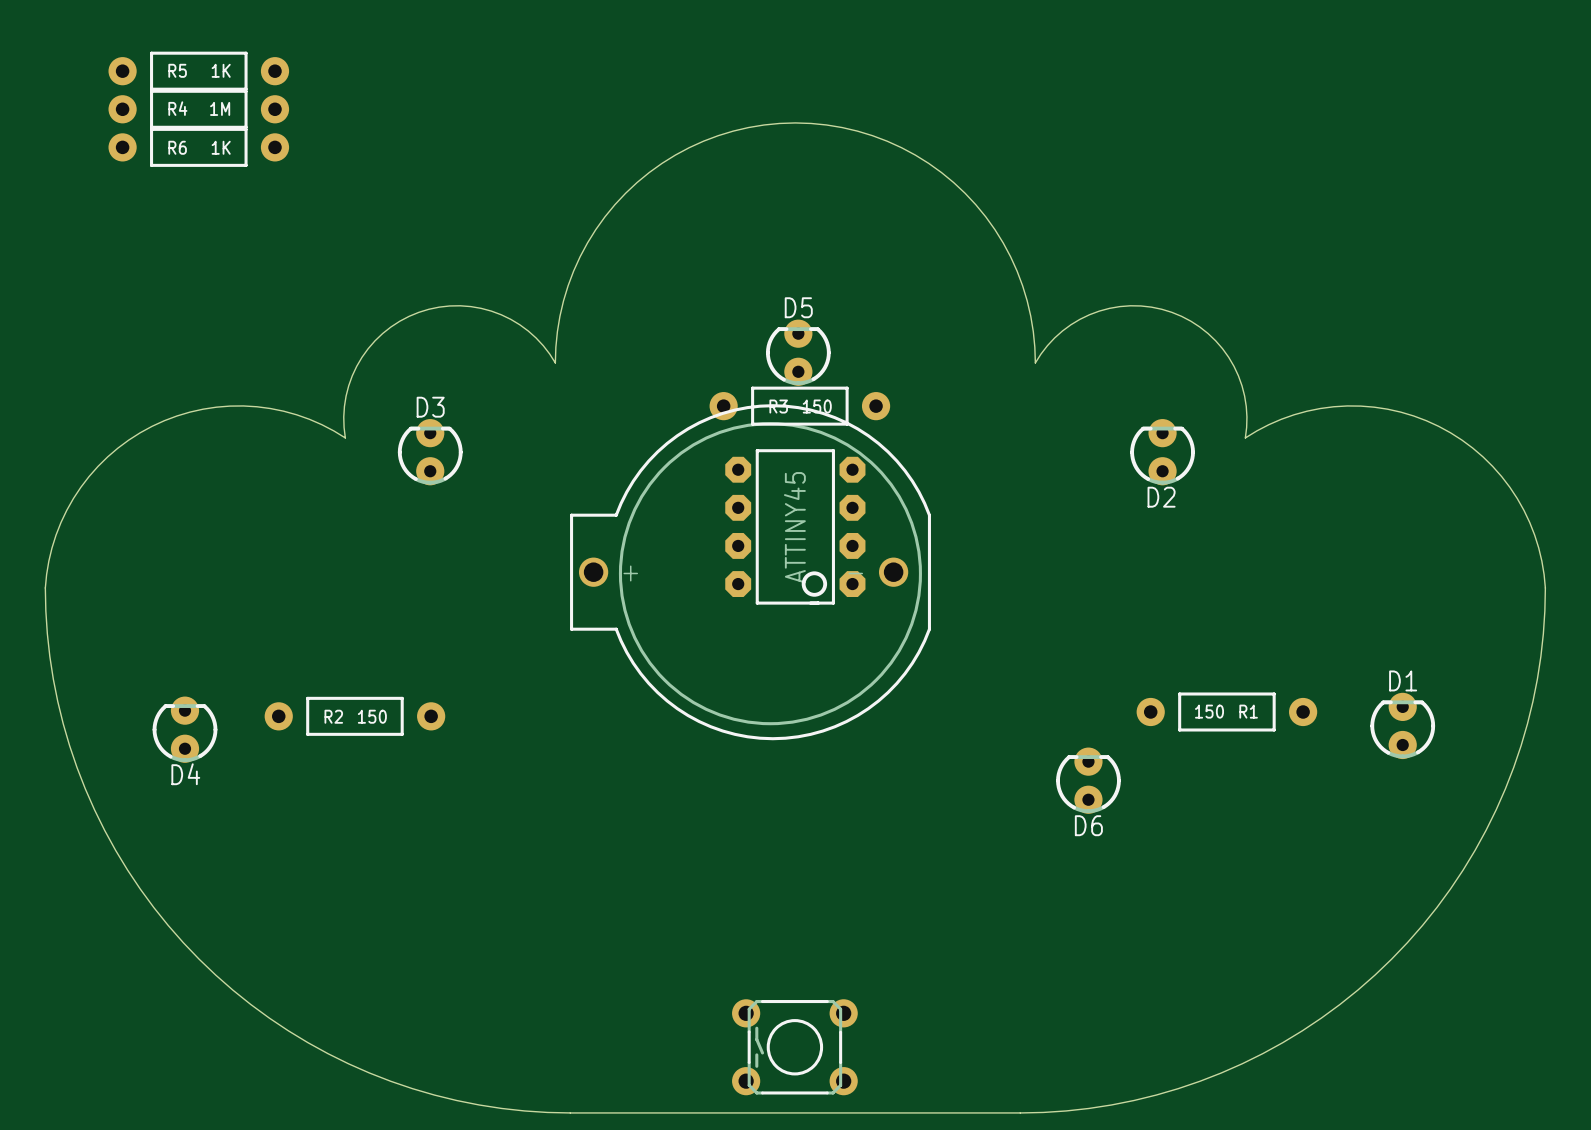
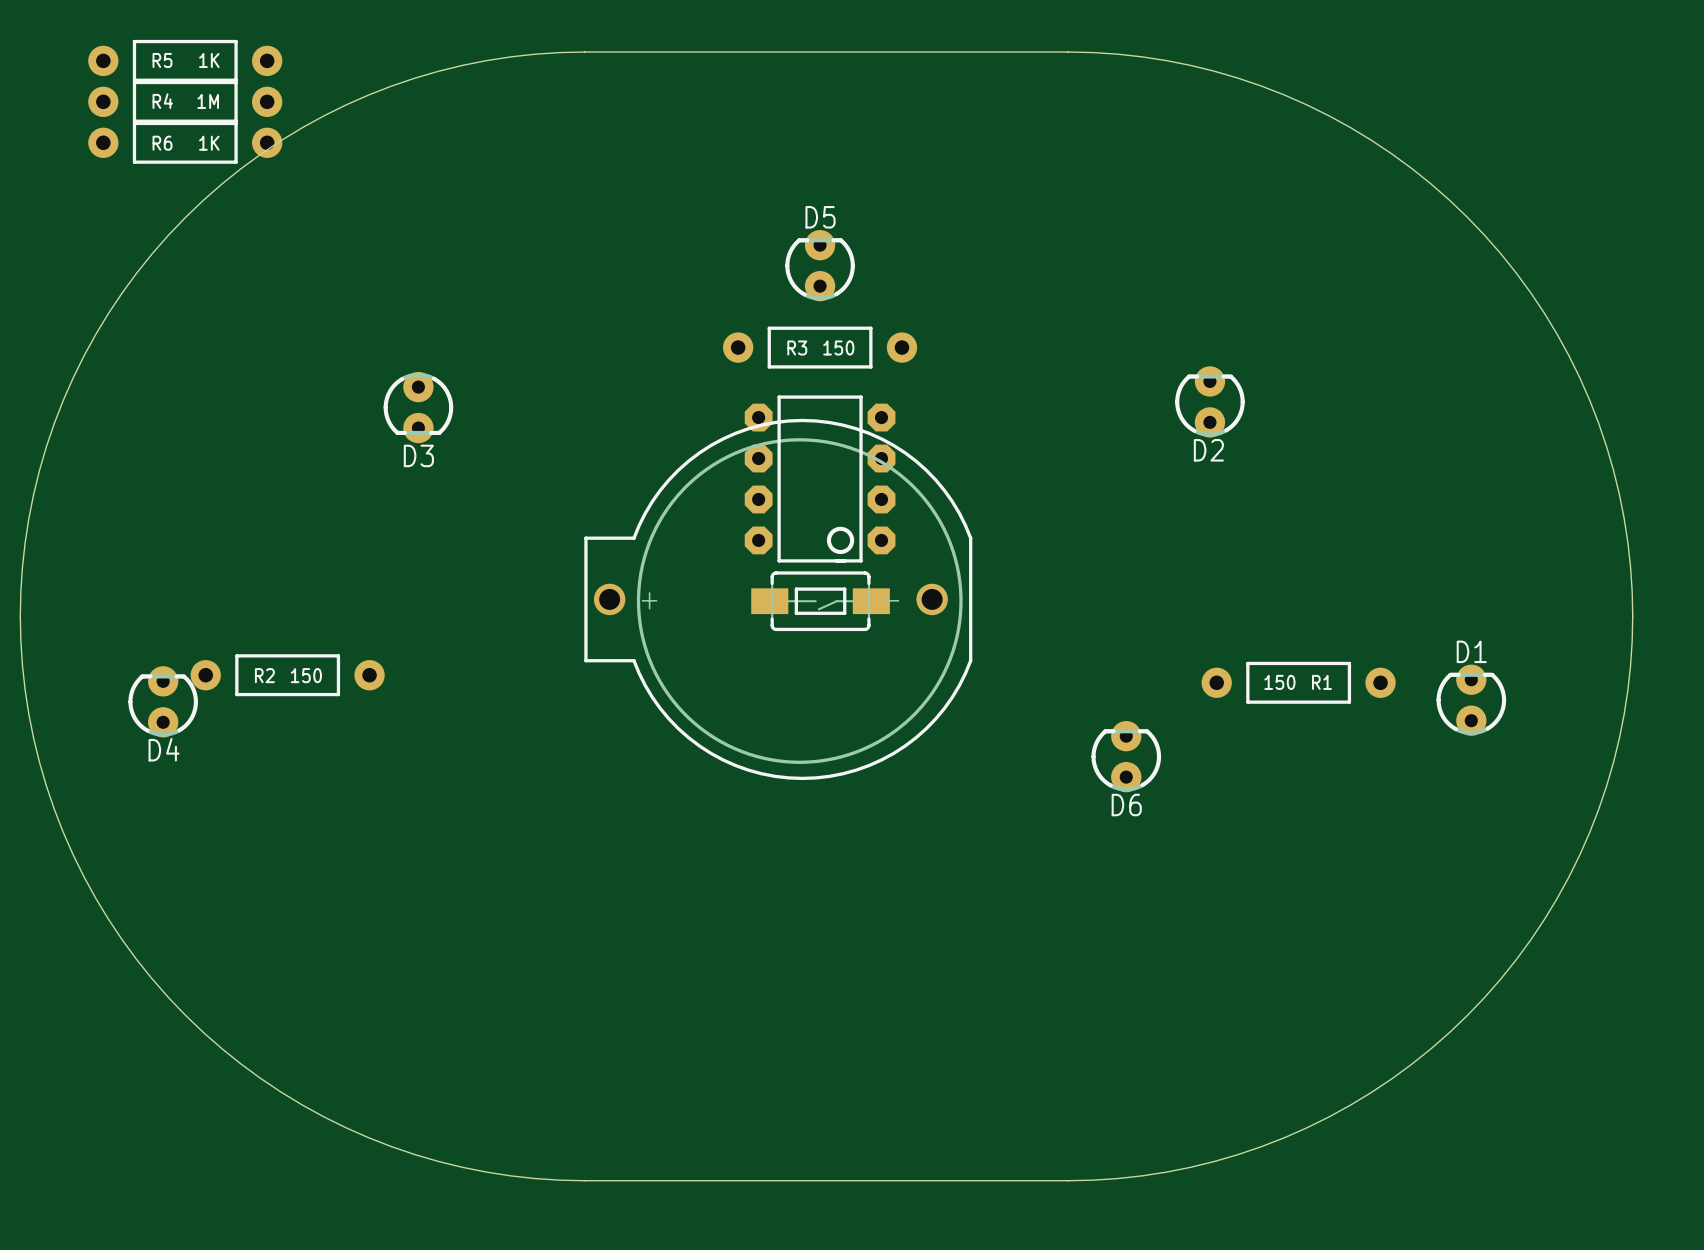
D5 position: (798, 352) -> (820, 265)
R3 position: (799, 406) -> (820, 347)
D3 rotation: 0° (430, 452) -> 180° (418, 407)
D3 position: (430, 452) -> (418, 407)
D2 position: (1162, 452) -> (1209, 401)
part: none -> (820, 478)
part: ATTINY45 (795, 526) -> none
part: none -> (820, 601)
board edge: (1545, 587) (1538, 548) (1529, 522) (1517, 498) (1492, 466) (1472, 448) (1450, 432) (1426, 420) (1400, 412) (1374, 407) (1347, 405) (1320, 408) (1294, 414) (1268, 424) (1245, 437) (1246, 416) (1242, 385) (1234, 366) (1222, 348) (1208, 333) (1190, 321) (1171, 312) (1151, 307) (1130, 305) (1109, 308) (1079, 319) (1054, 337) (1035, 362) (1030, 316) (1017, 271) (994, 229) (965, 193) (928, 163) (887, 141) (842, 127) (795, 122) (748, 127) (703, 141) (662, 163) (625, 193) (595, 229) (573, 271) (559, 316) (555, 362) (536, 337) (510, 319) (481, 308) (460, 305) (439, 307) (418, 312) (399, 321) (382, 333) (368, 348) (356, 366) (348, 385) (343, 416) (345, 437) (321, 424) (296, 414) (270, 408) (243, 405) (216, 407) (189, 412) (164, 420) (140, 432) (117, 448) (98, 466) (73, 498) (60, 522) (51, 548) (45, 587) -> (1632, 616) (1627, 542) (1619, 494) (1606, 446) (1589, 400) (1568, 355) (1544, 313) (1500, 253) (1467, 217) (1431, 184) (1371, 140) (1328, 115) (1284, 94) (1238, 78) (1190, 65) (1142, 56) (1068, 52) (584, 52) (535, 54) (486, 60) (438, 71) (368, 94) (324, 115) (260, 154) (203, 200) (168, 235) (136, 272) (95, 334) (63, 400) (39, 470) (25, 542) (20, 616)
R1 position: (1226, 712) -> (1298, 682)
R2 position: (354, 716) -> (287, 675)
D1 position: (1402, 725) -> (1471, 700)
D4 position: (184, 729) -> (163, 701)
D6 position: (1088, 780) -> (1126, 756)
part: (794, 1047) -> none

